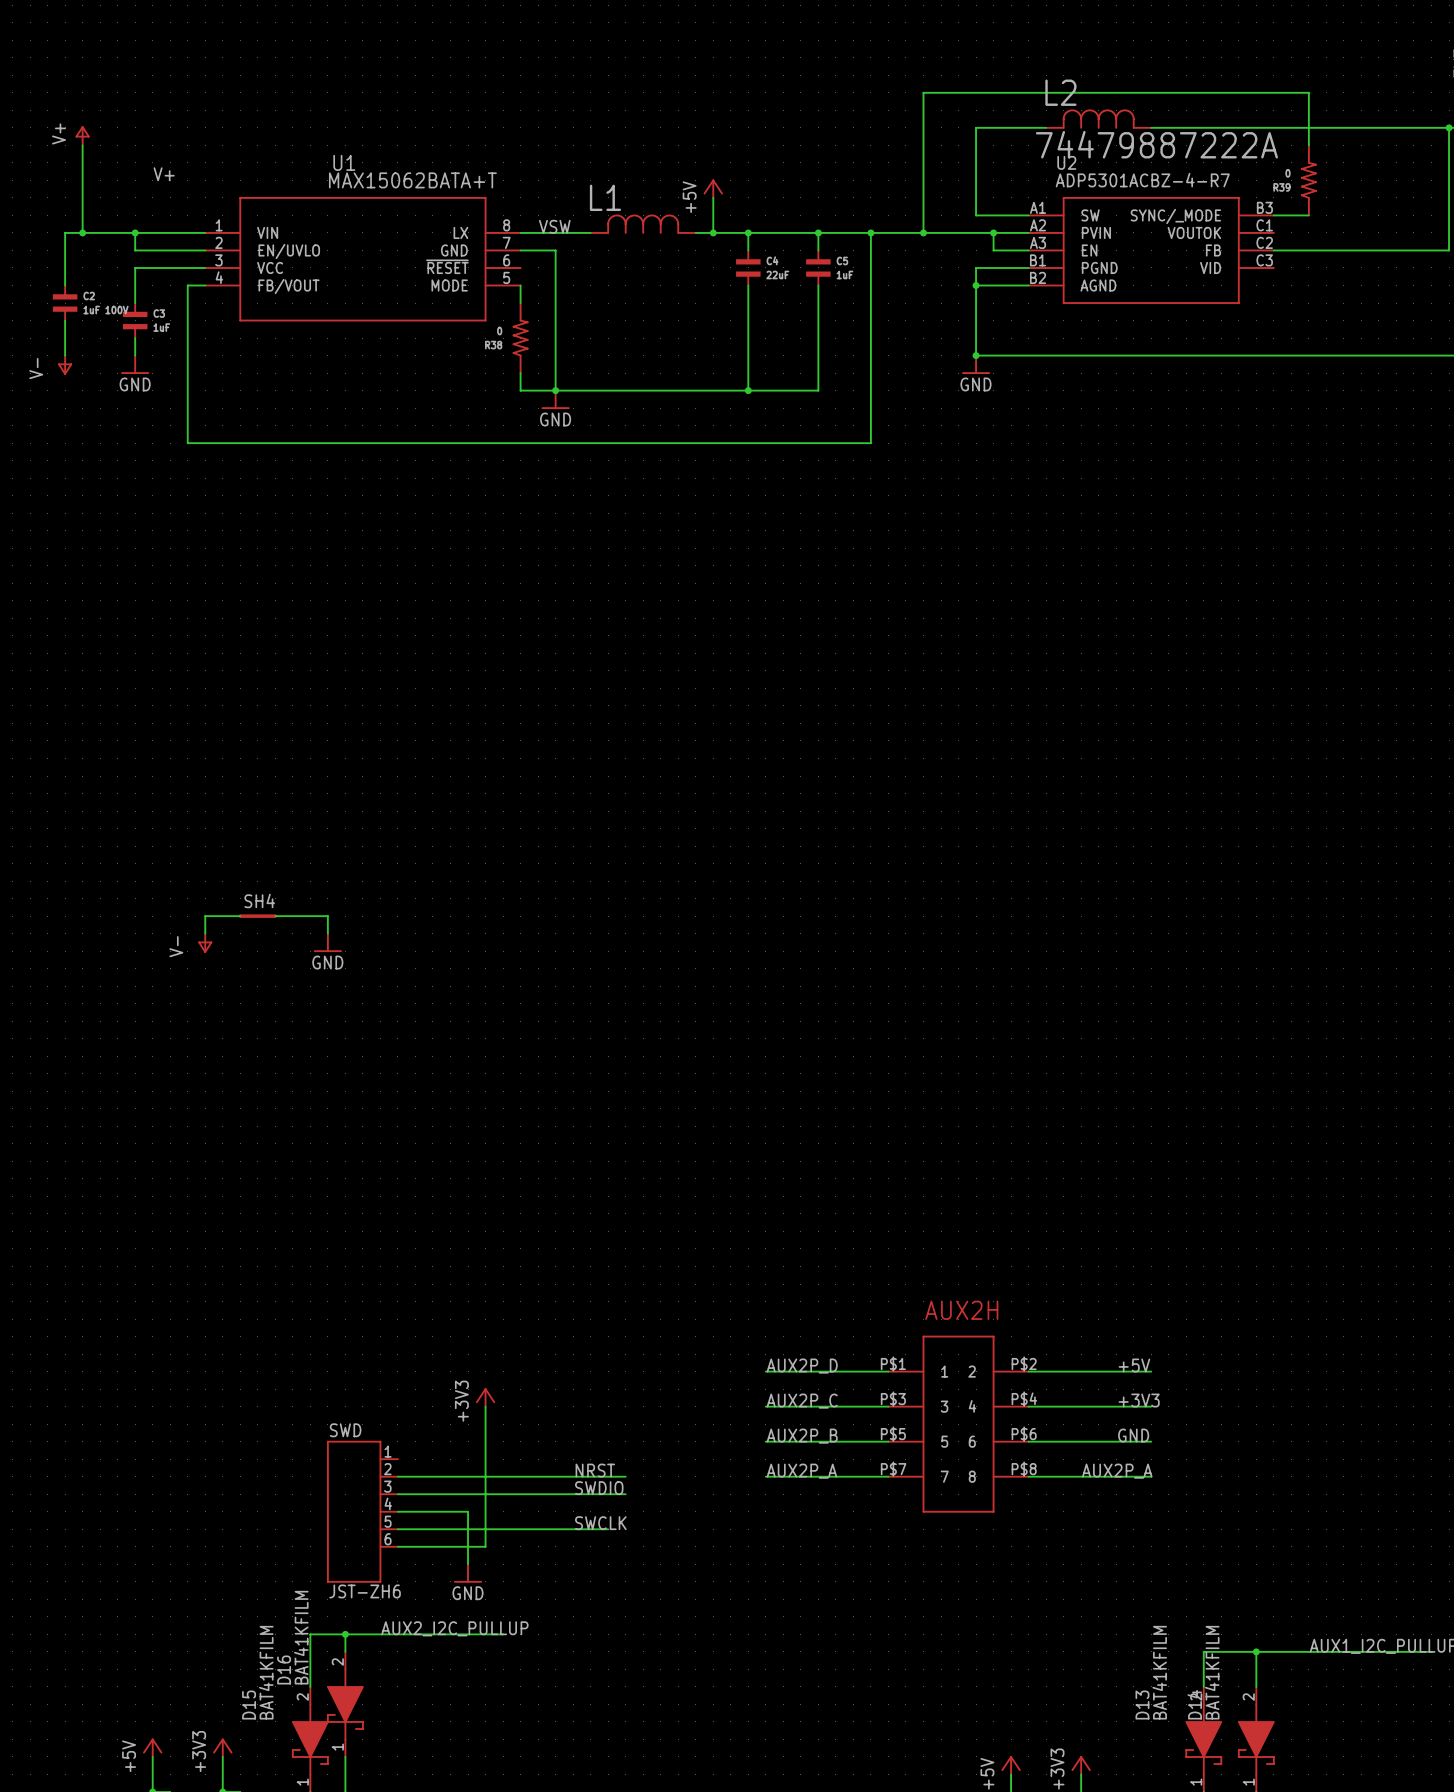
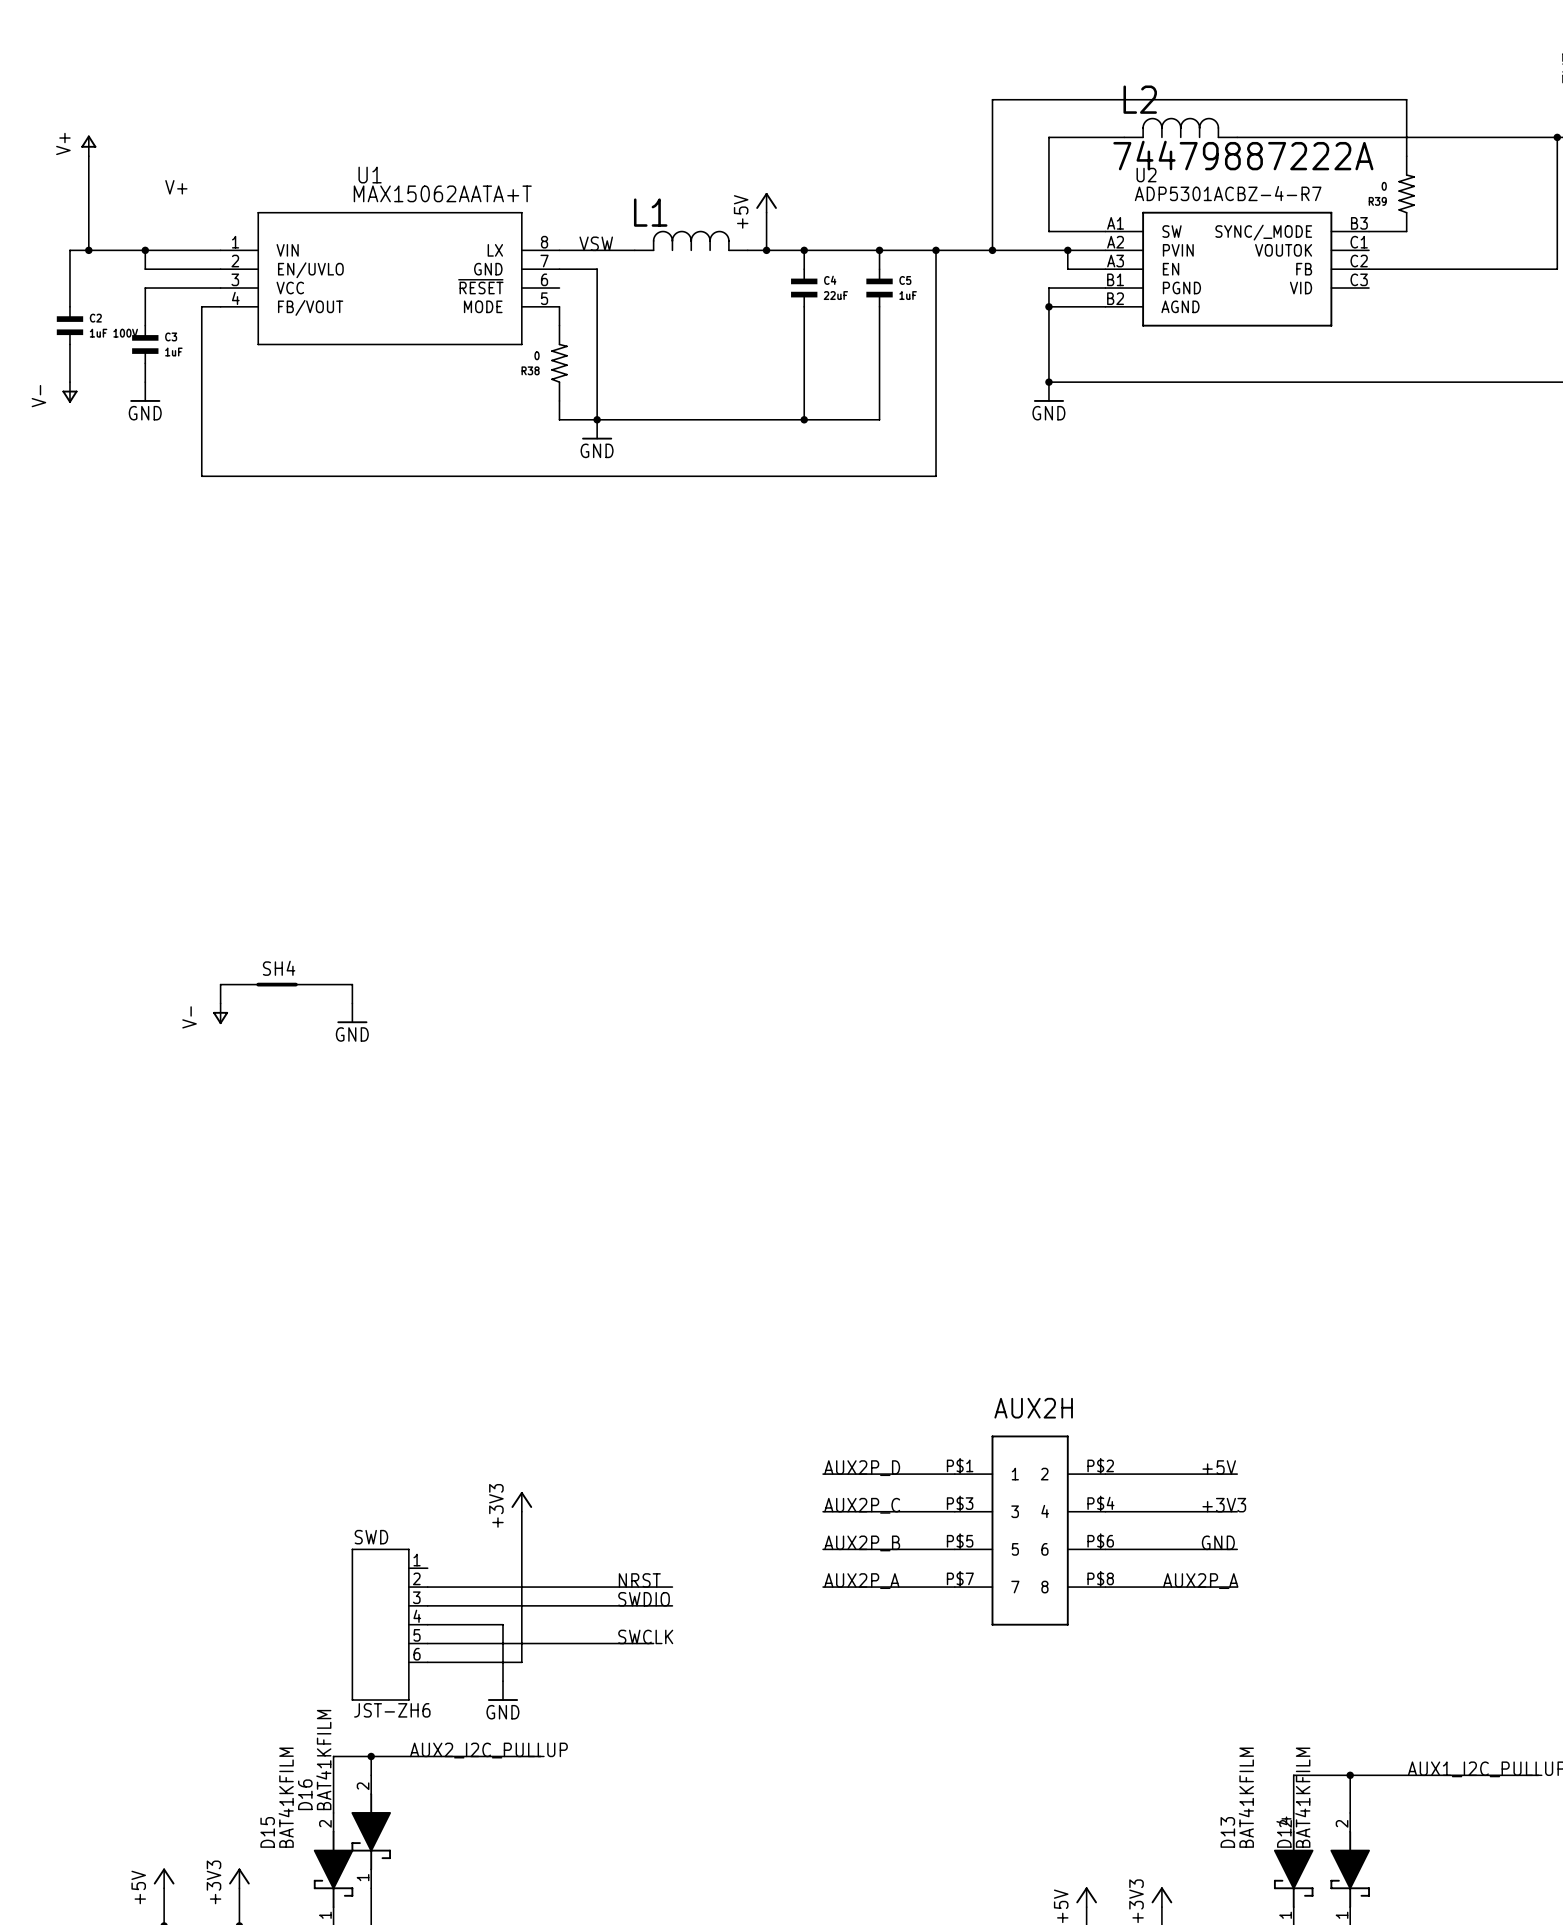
U1 value: MAX15062BATA+T (412, 180) -> MAX15062AATA+T (442, 193)

